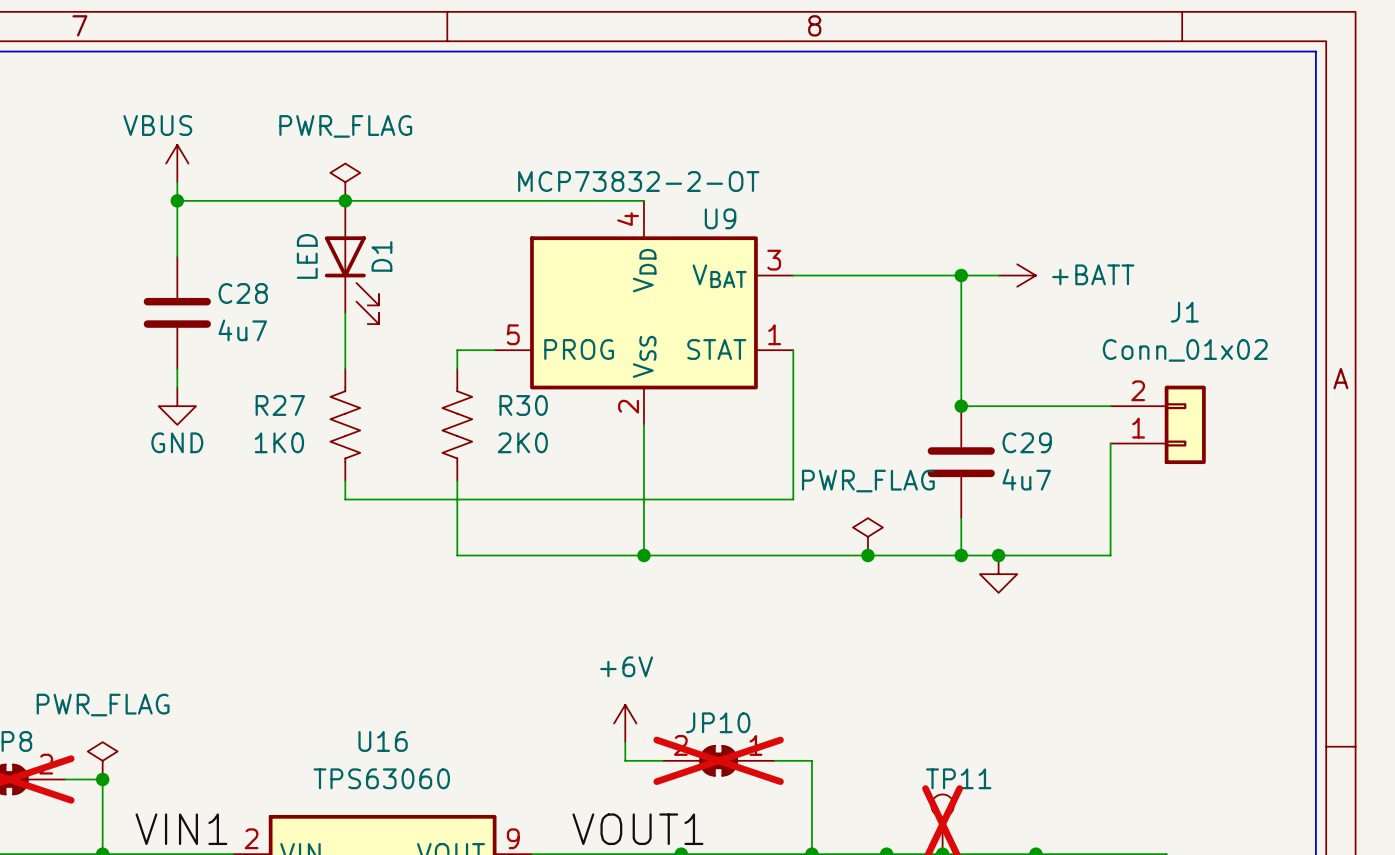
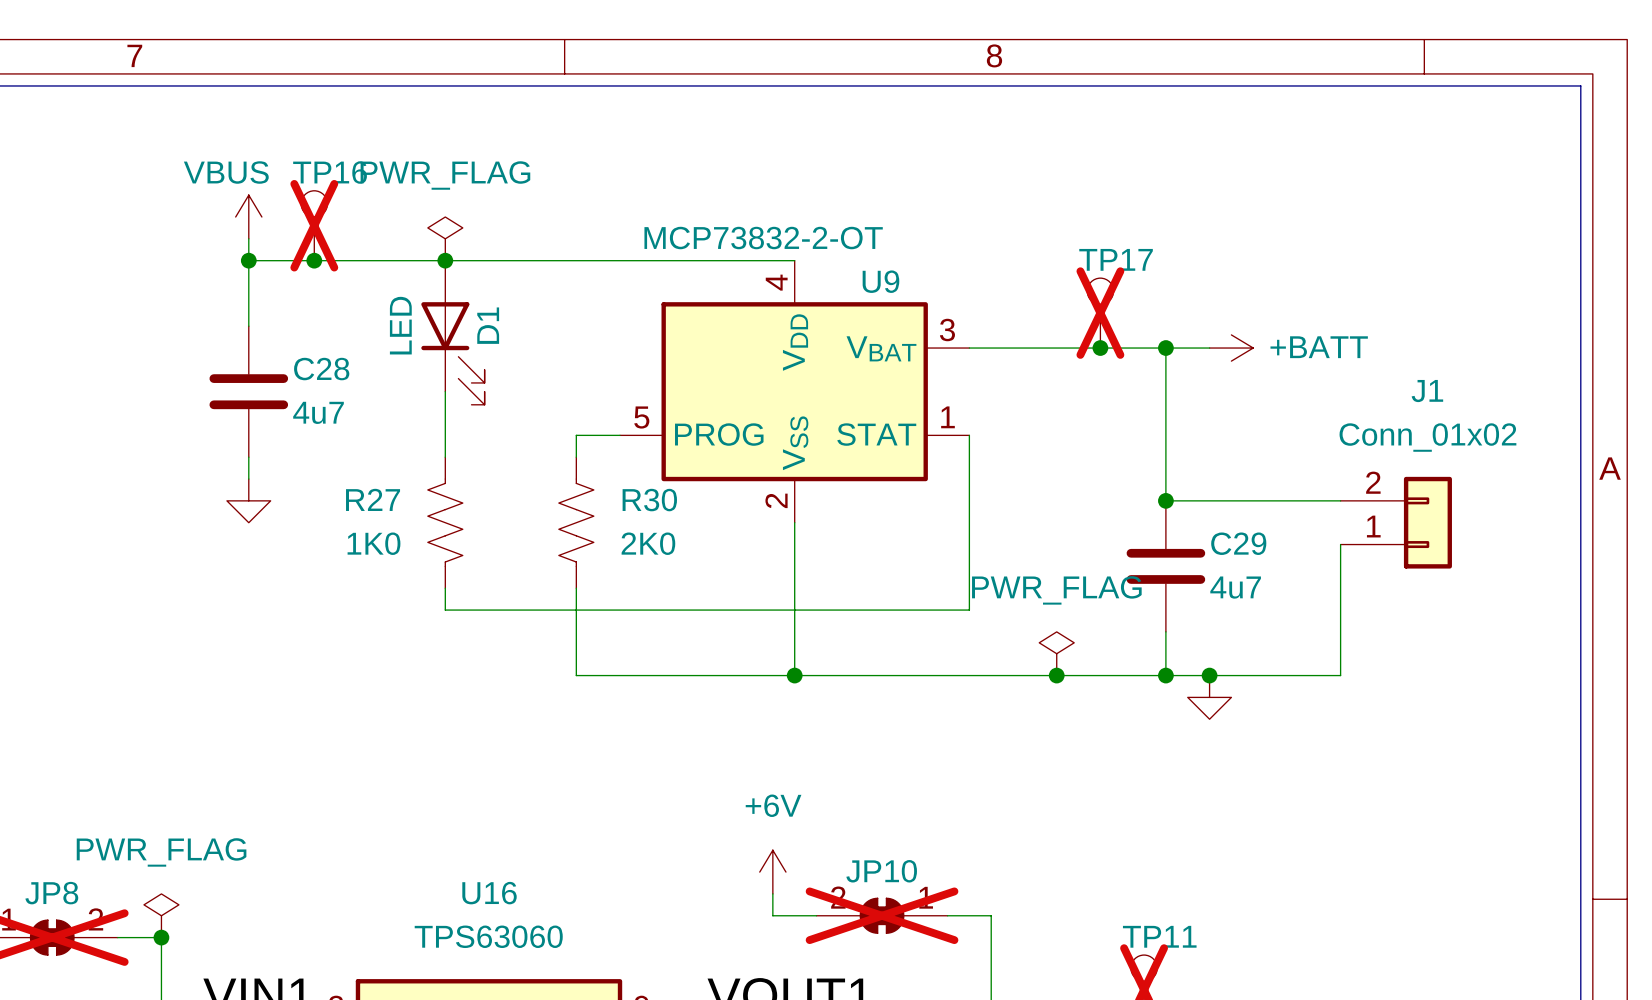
TP16: none -> (314, 225)
junction: none -> (314, 260)
TP17: none -> (1100, 313)
junction: none -> (1100, 348)
power symbol text: GND (177, 442) -> none

